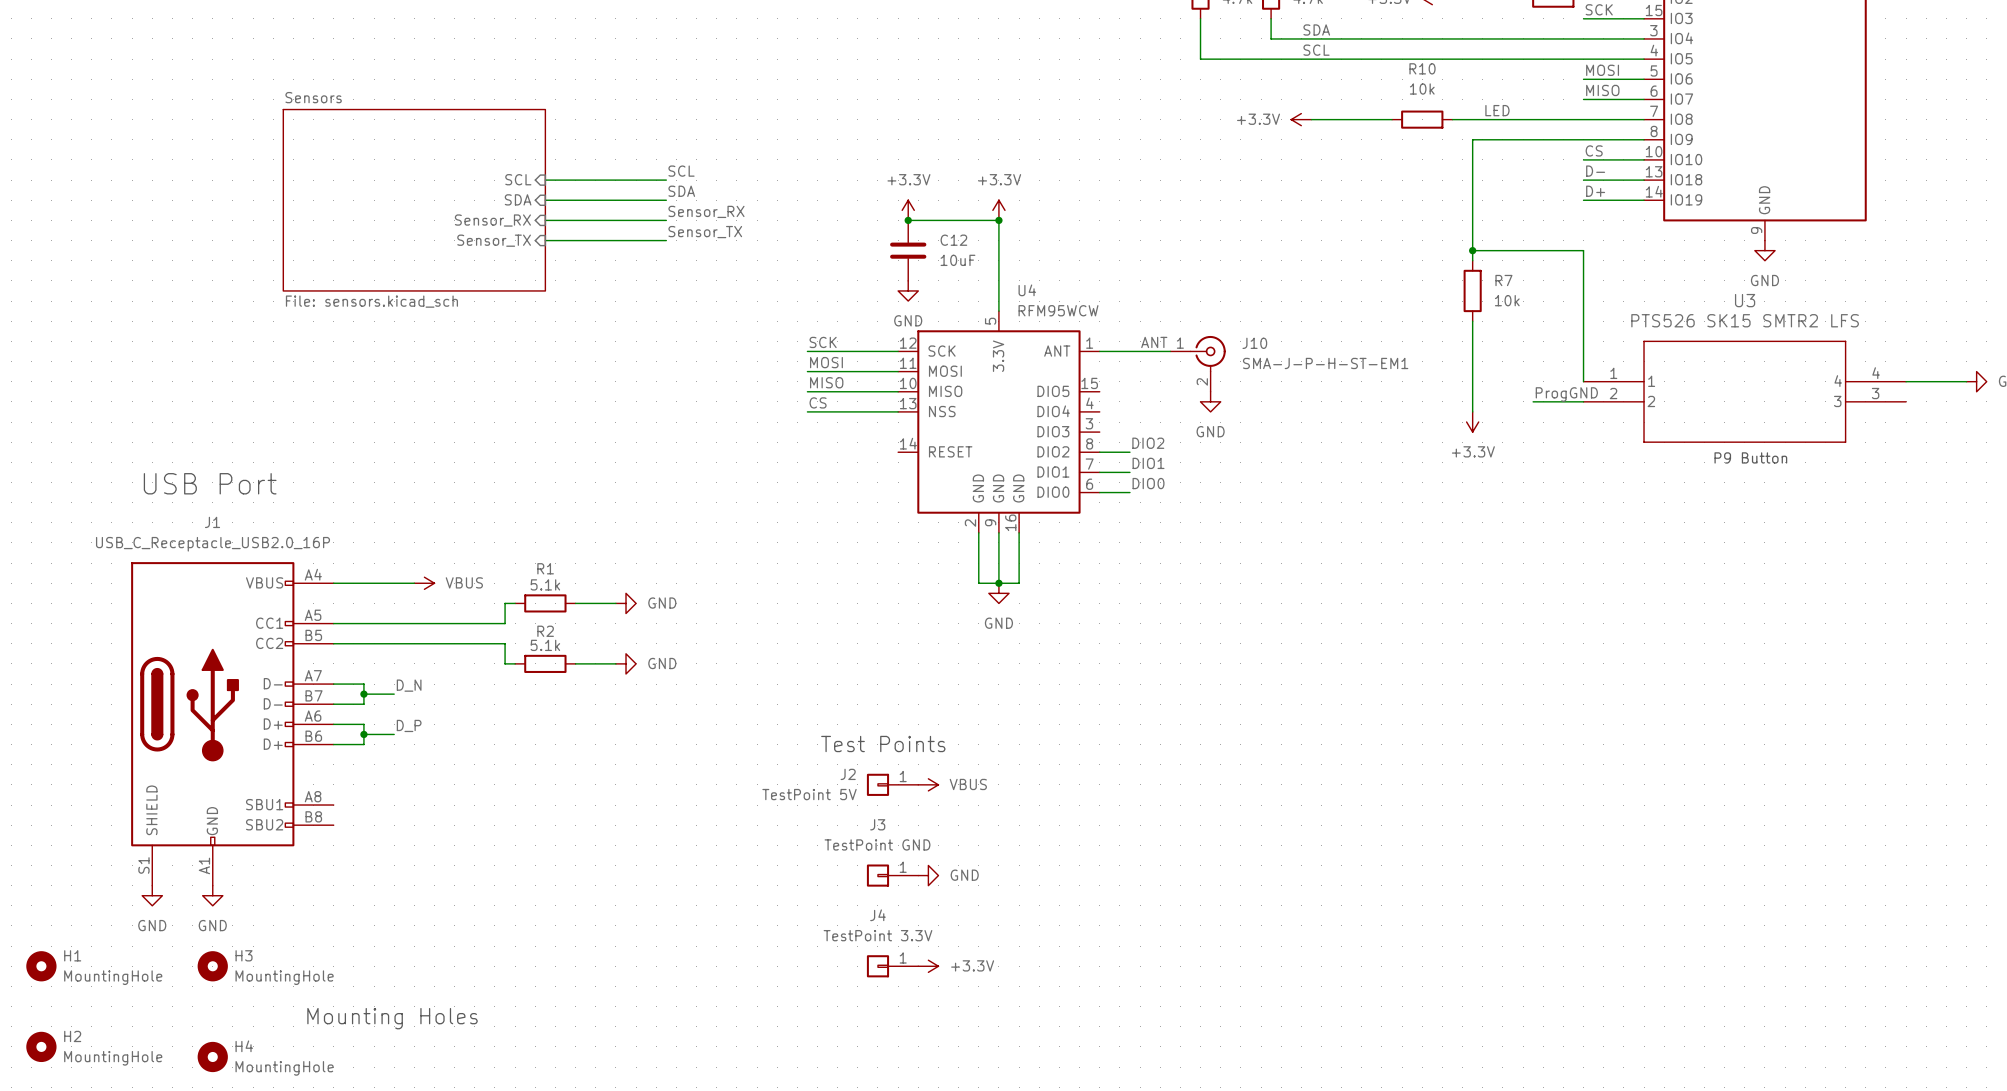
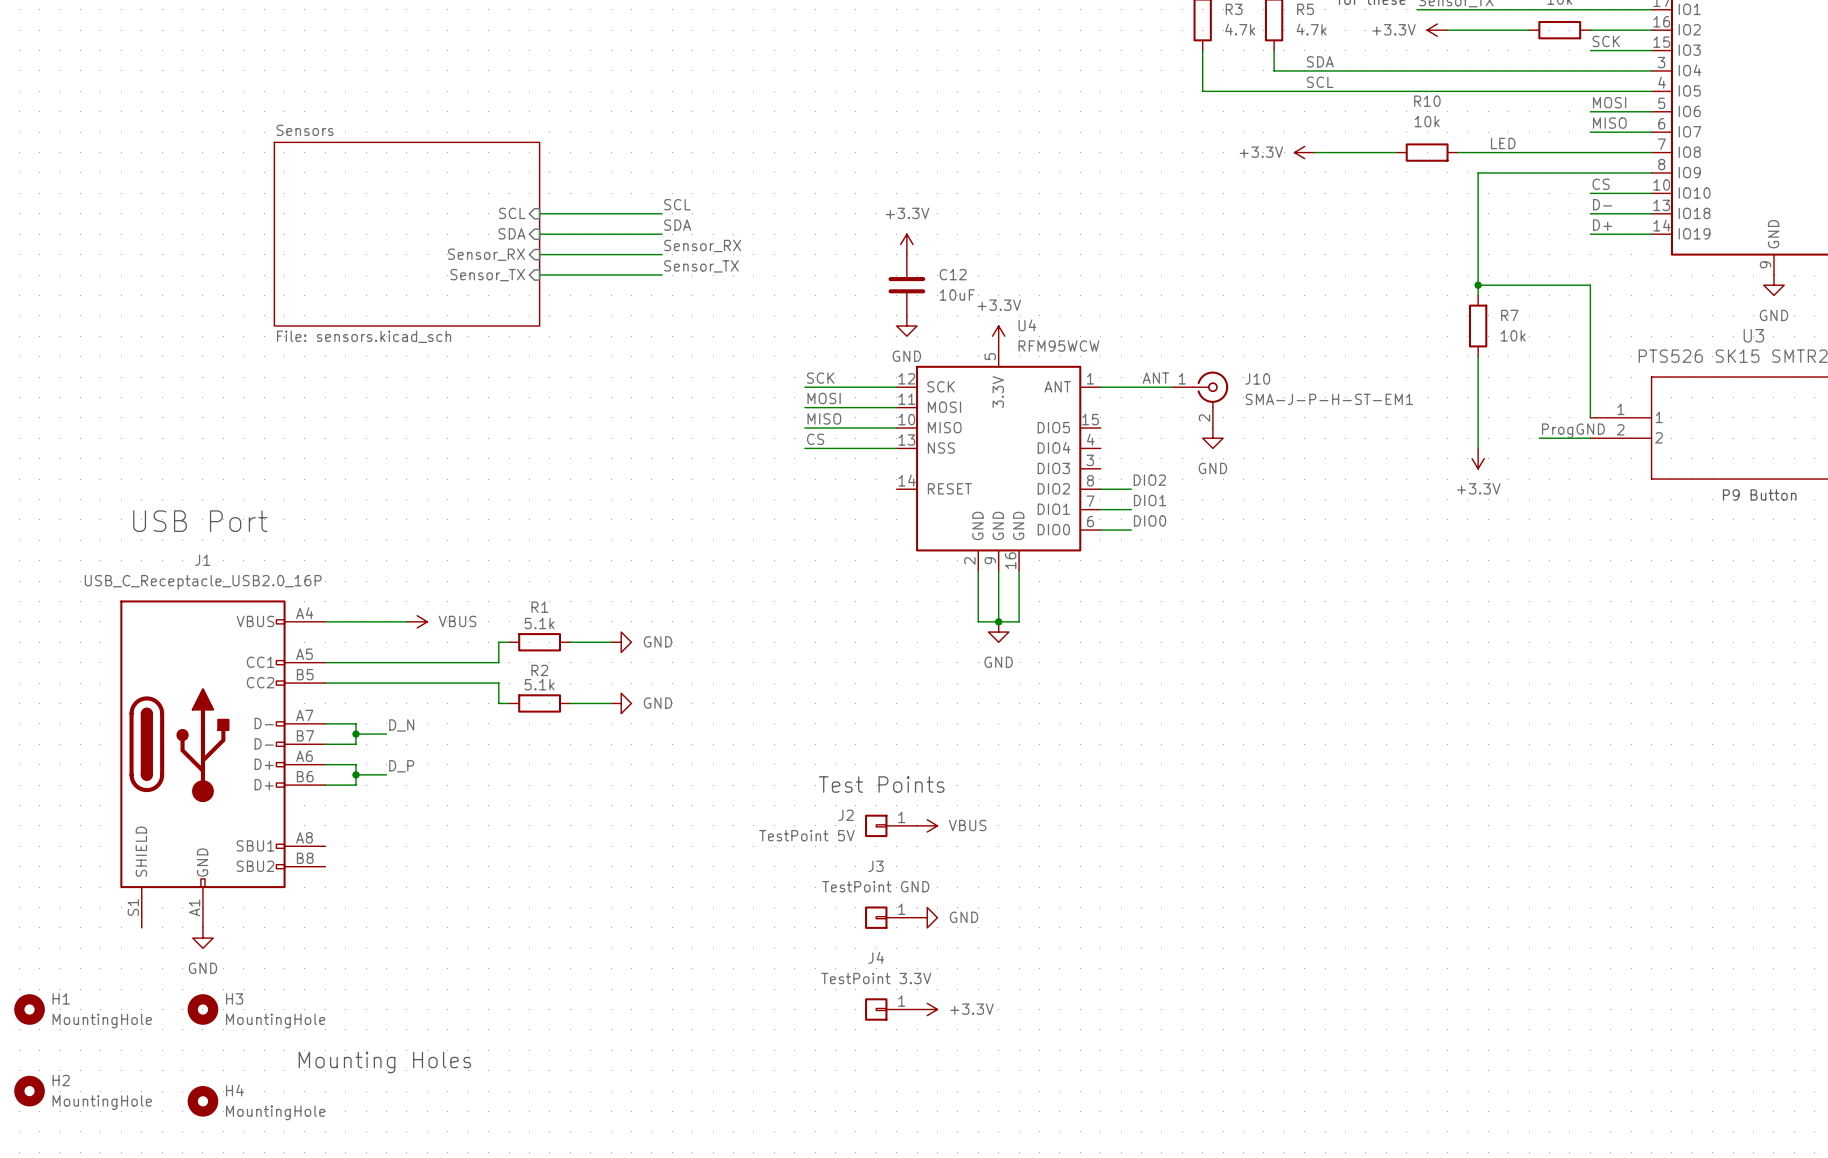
power symbol position: +3.3V (998, 210) -> +3.3V (998, 336)
wire: (908, 220) (998, 220) (998, 311) -> none
junction: (908, 220) -> none
junction: (998, 220) -> none
power symbol: GND (152, 895) -> none

